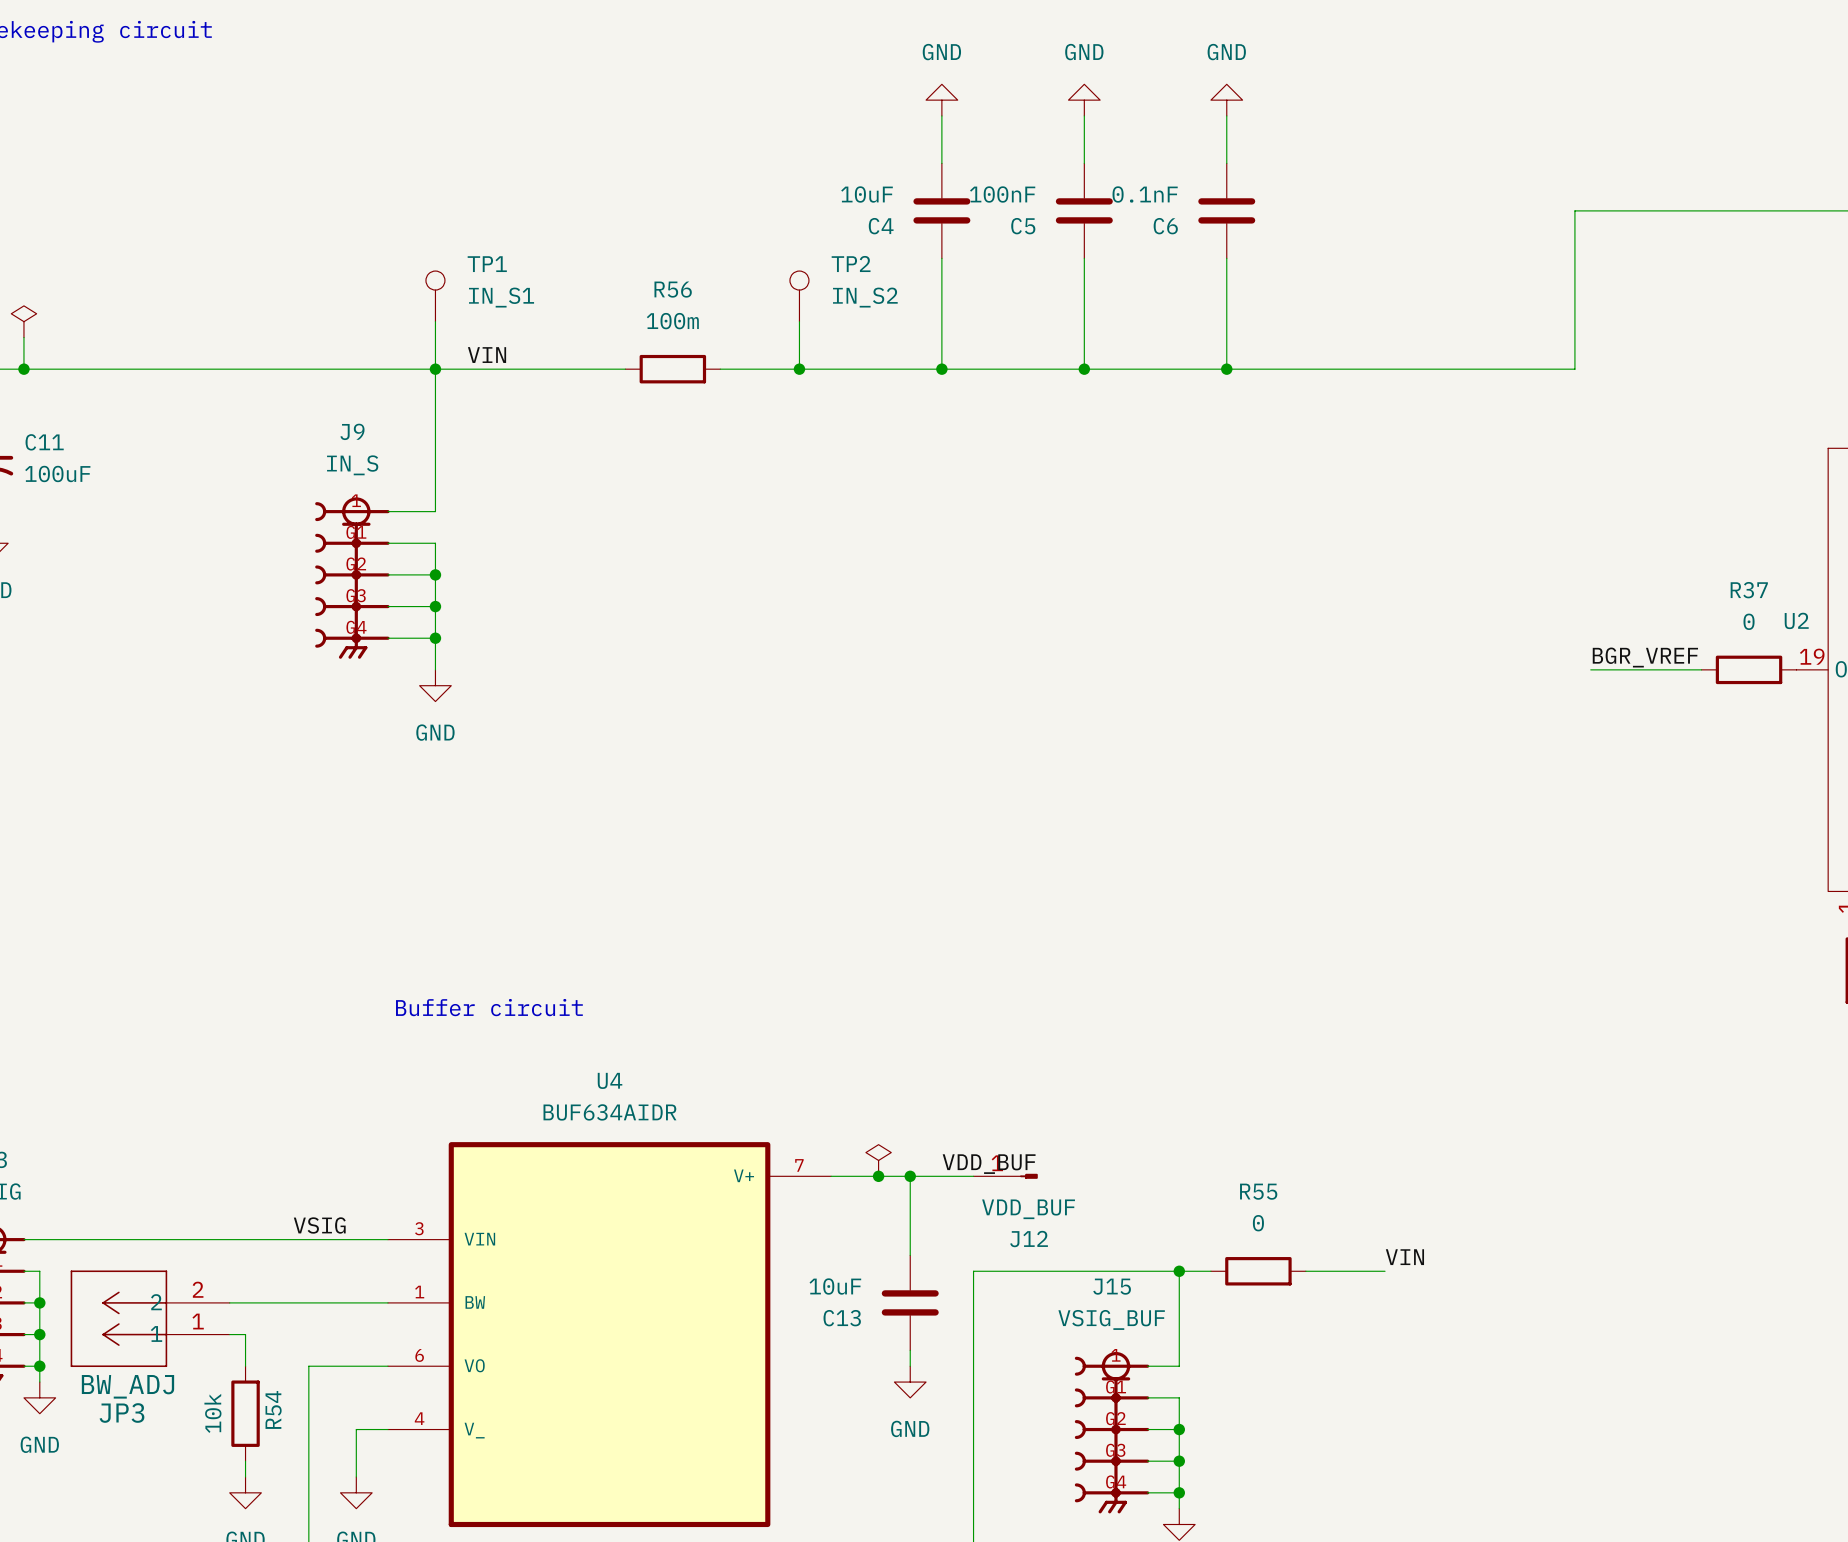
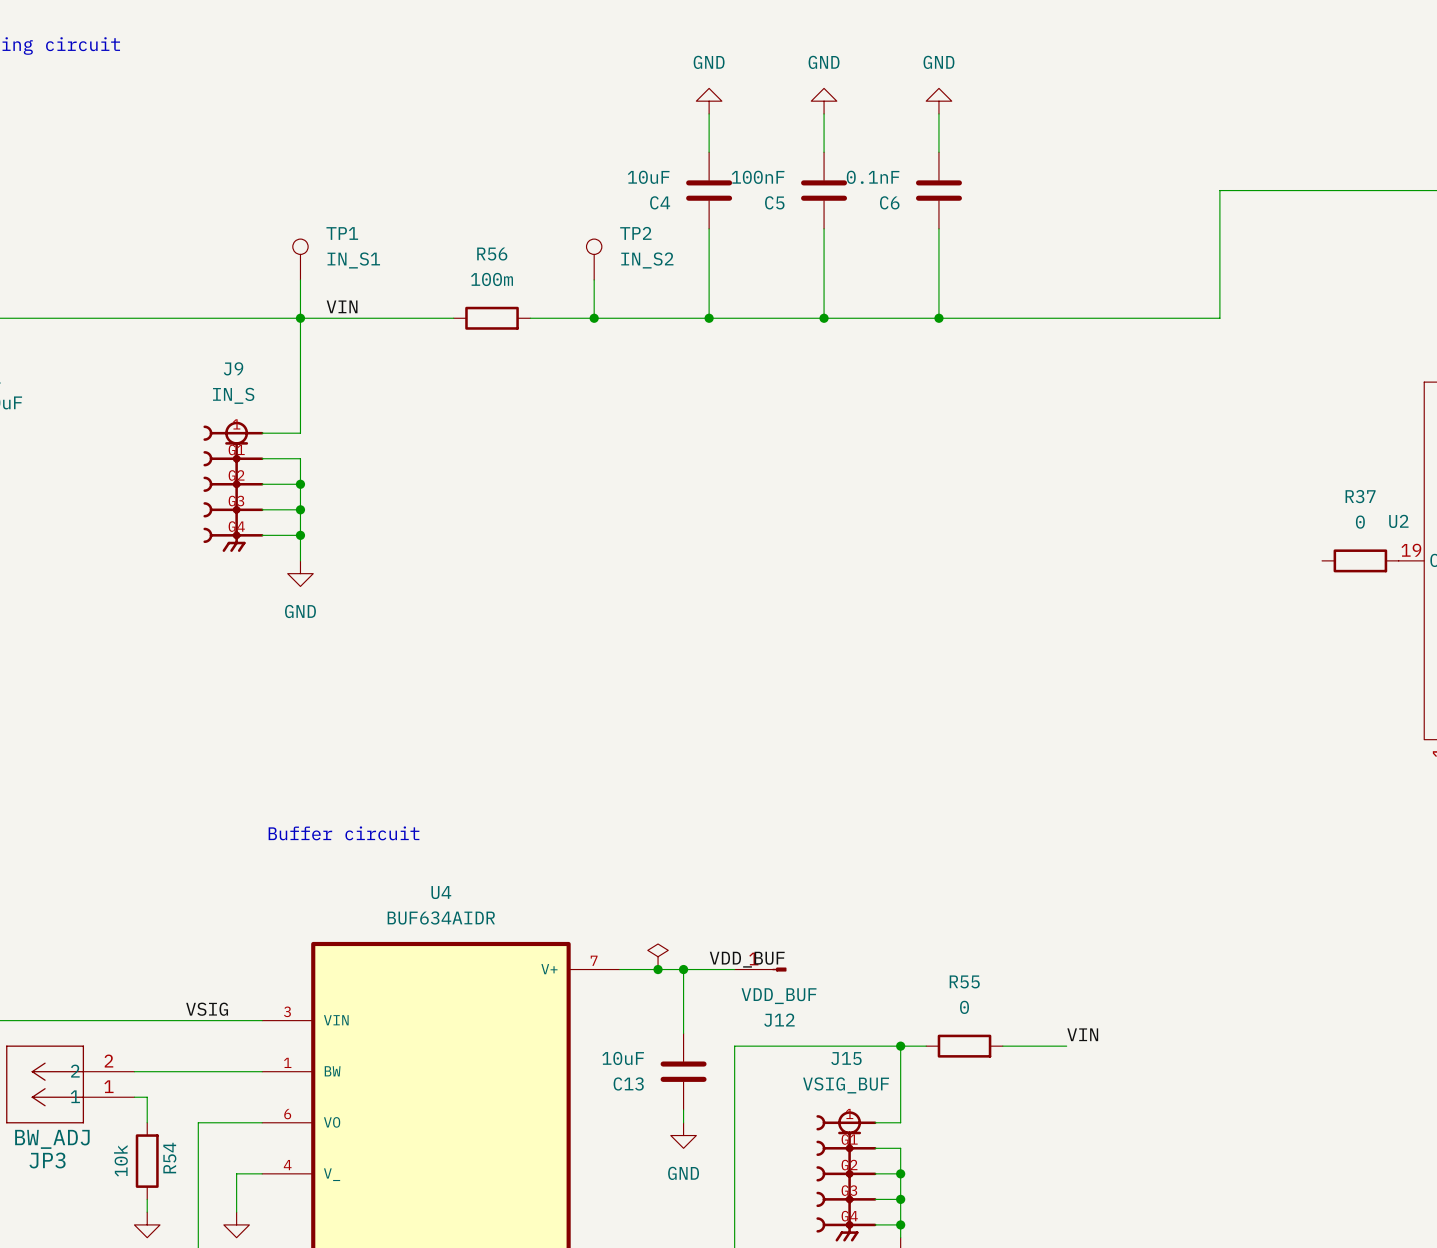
label: BGR_VREF (1645, 657) -> none
wire: (1590, 669) (1701, 669) -> none

